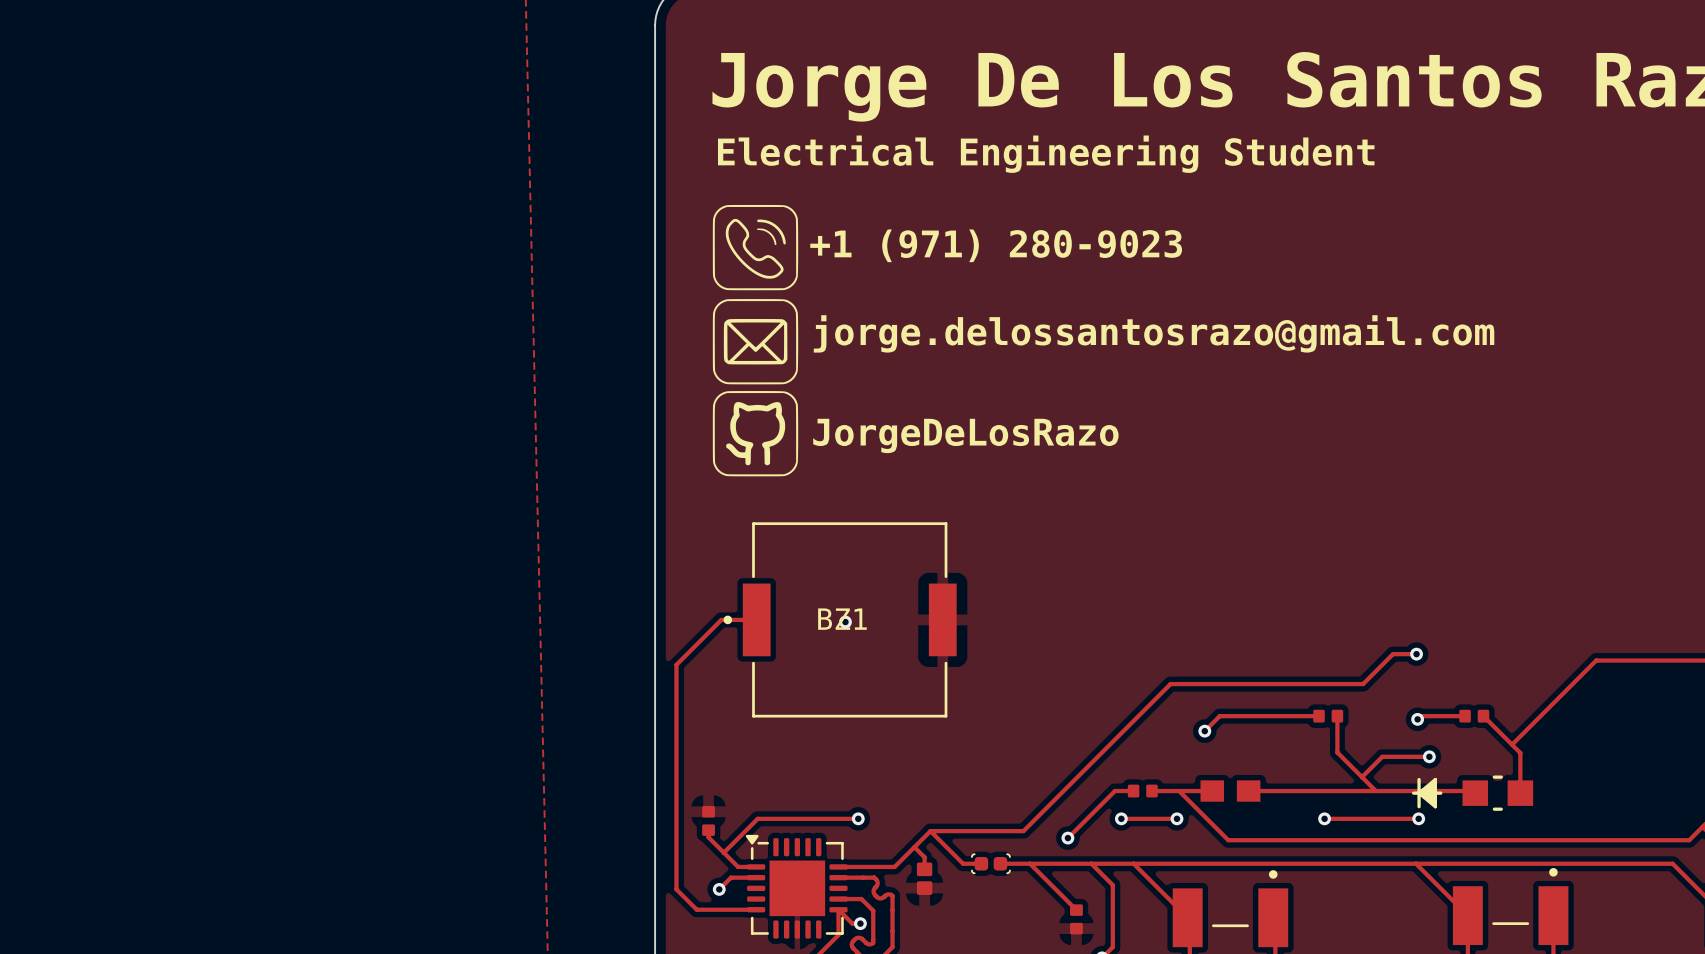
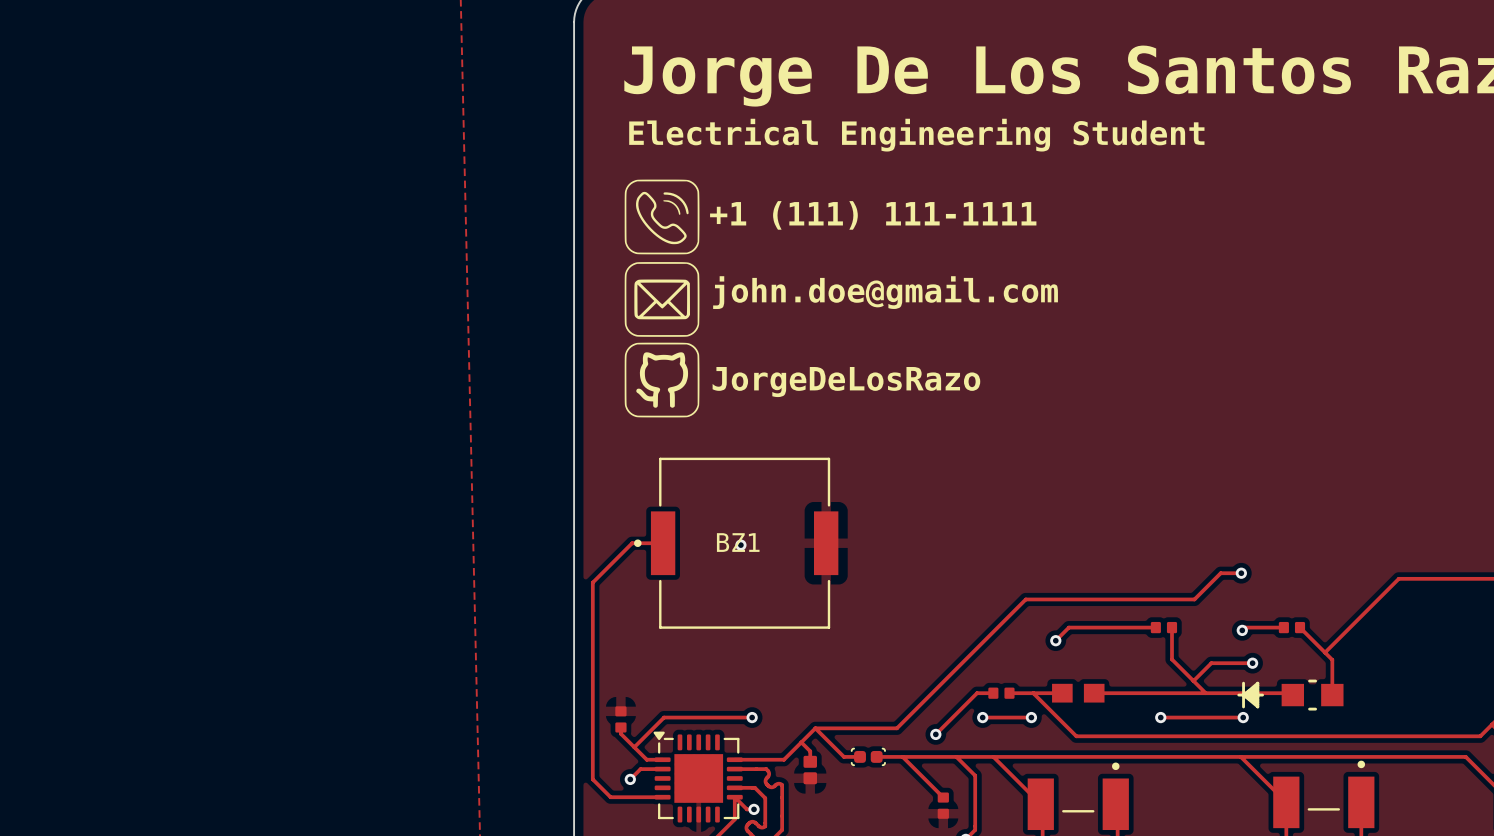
text: +1 (971) 280-9023 (996, 245) -> +1 (111) 111-1111 (873, 215)
text: jorge.delossantosrazo@gmail.com (1154, 333) -> john.doe@gmail.com (885, 292)

